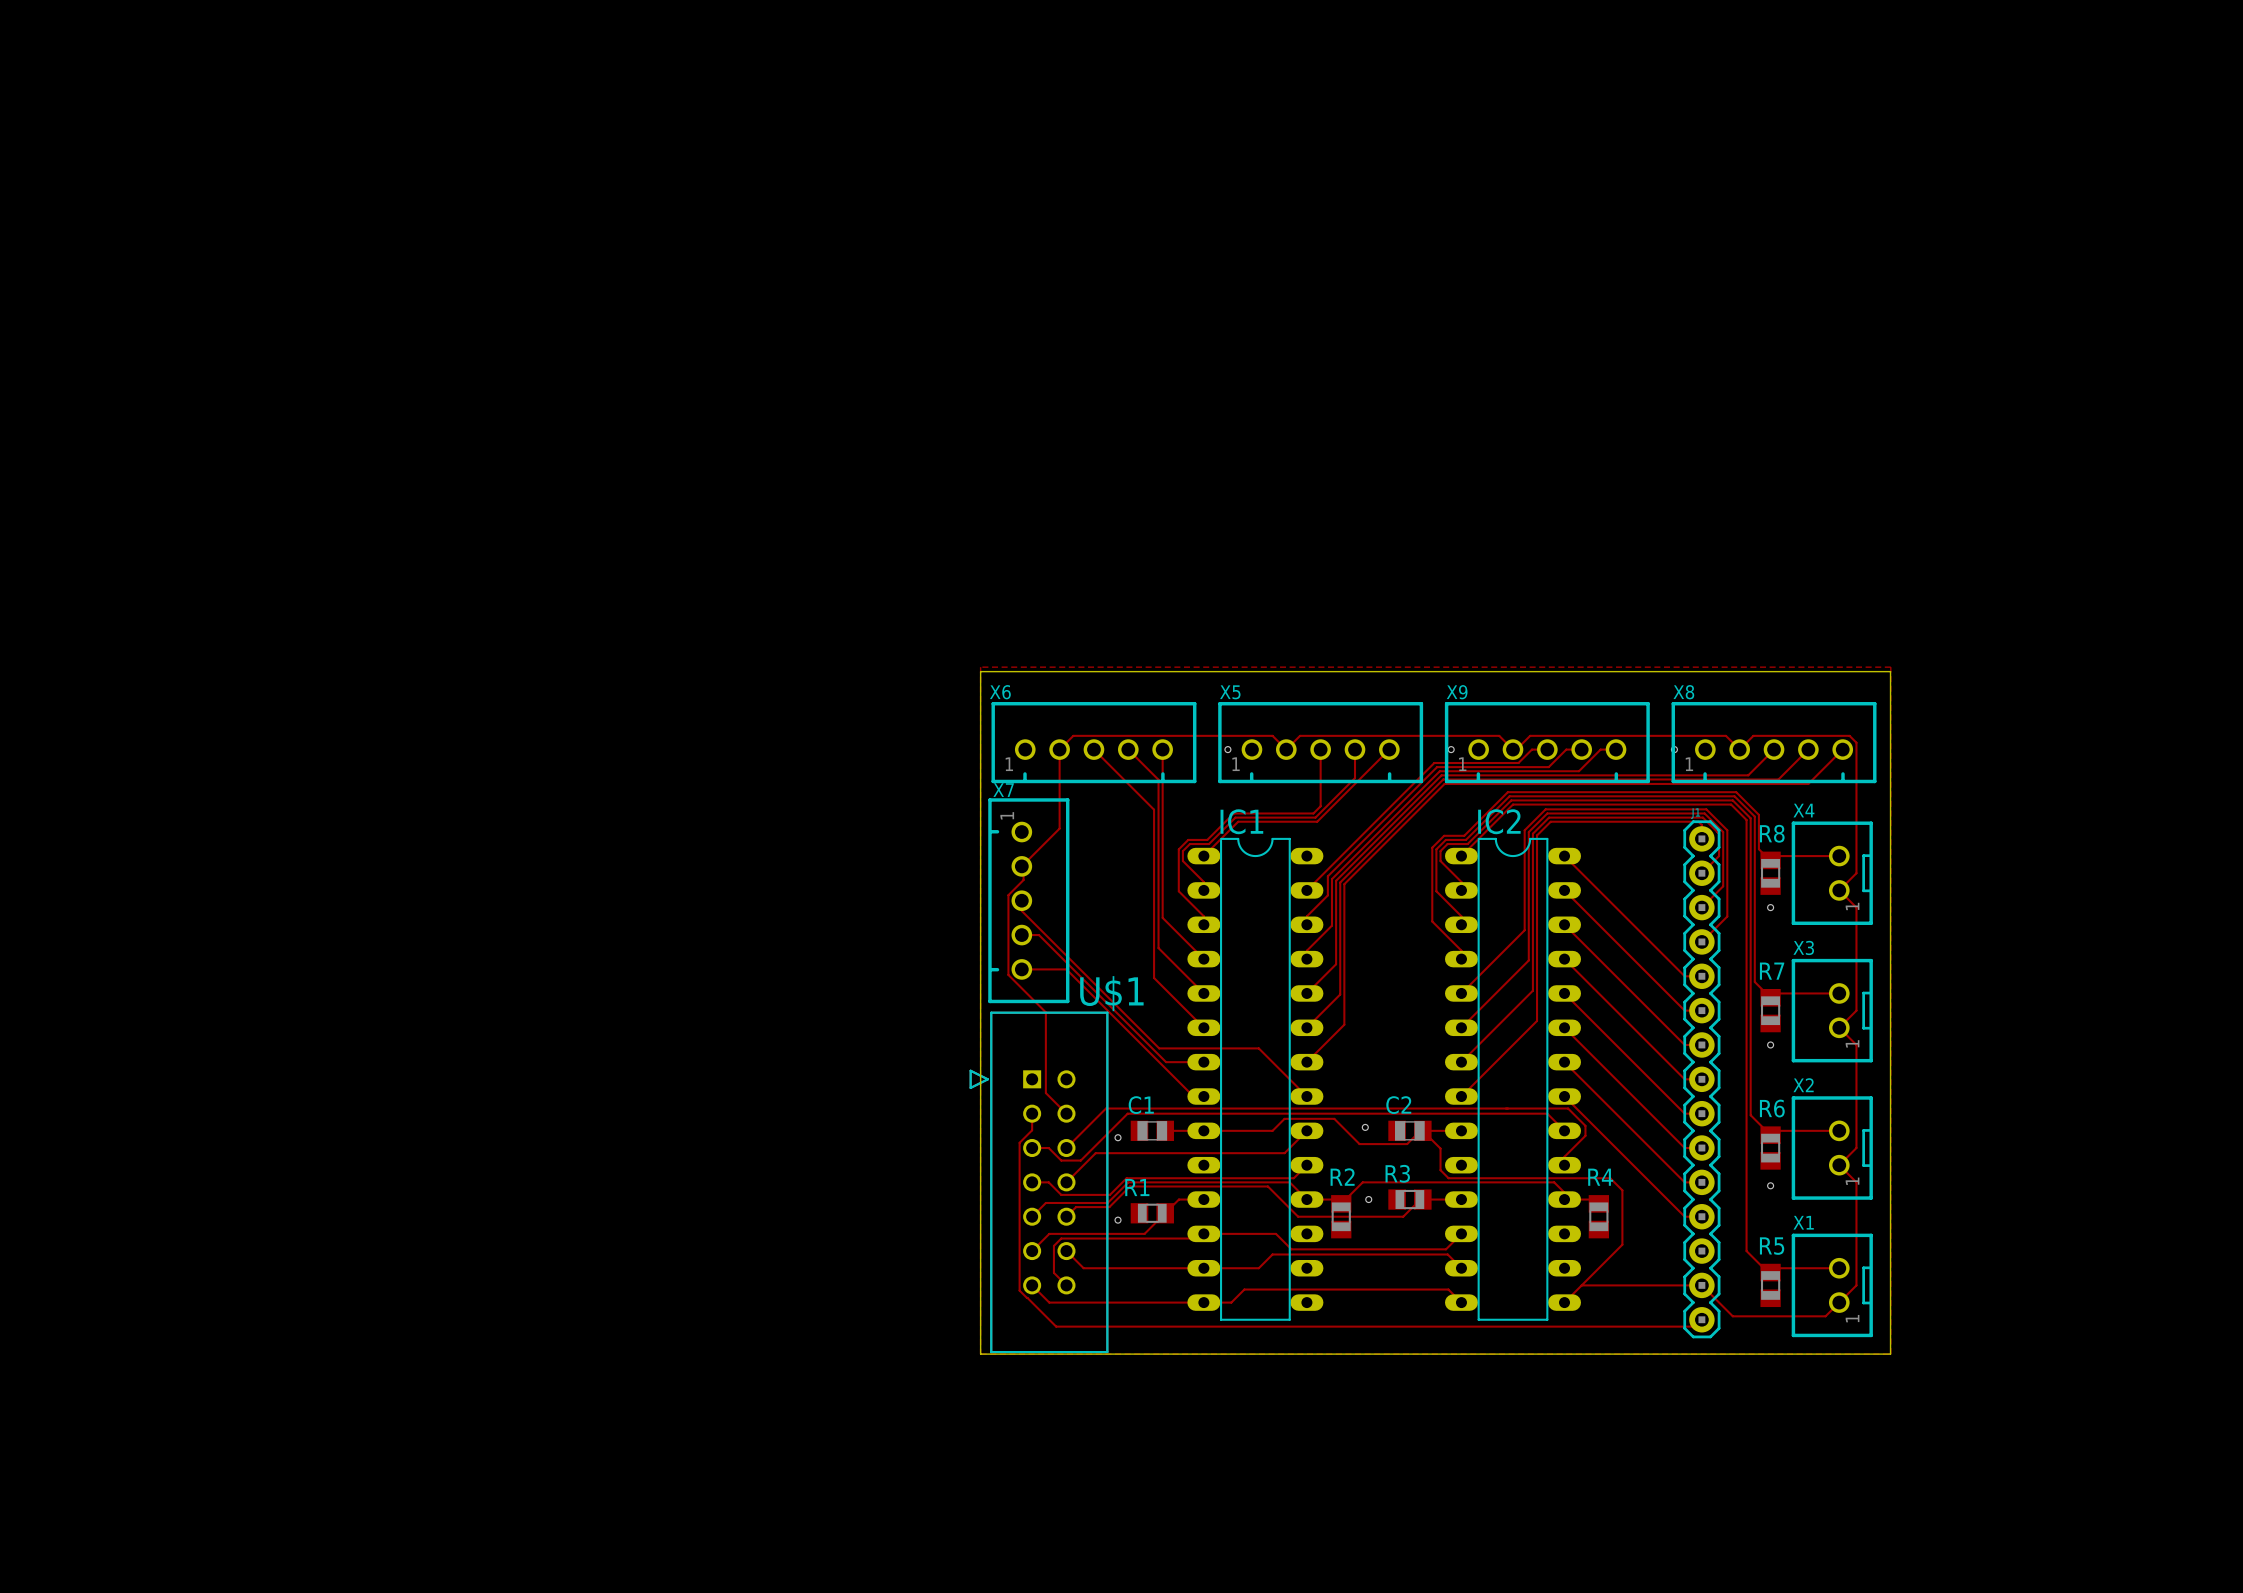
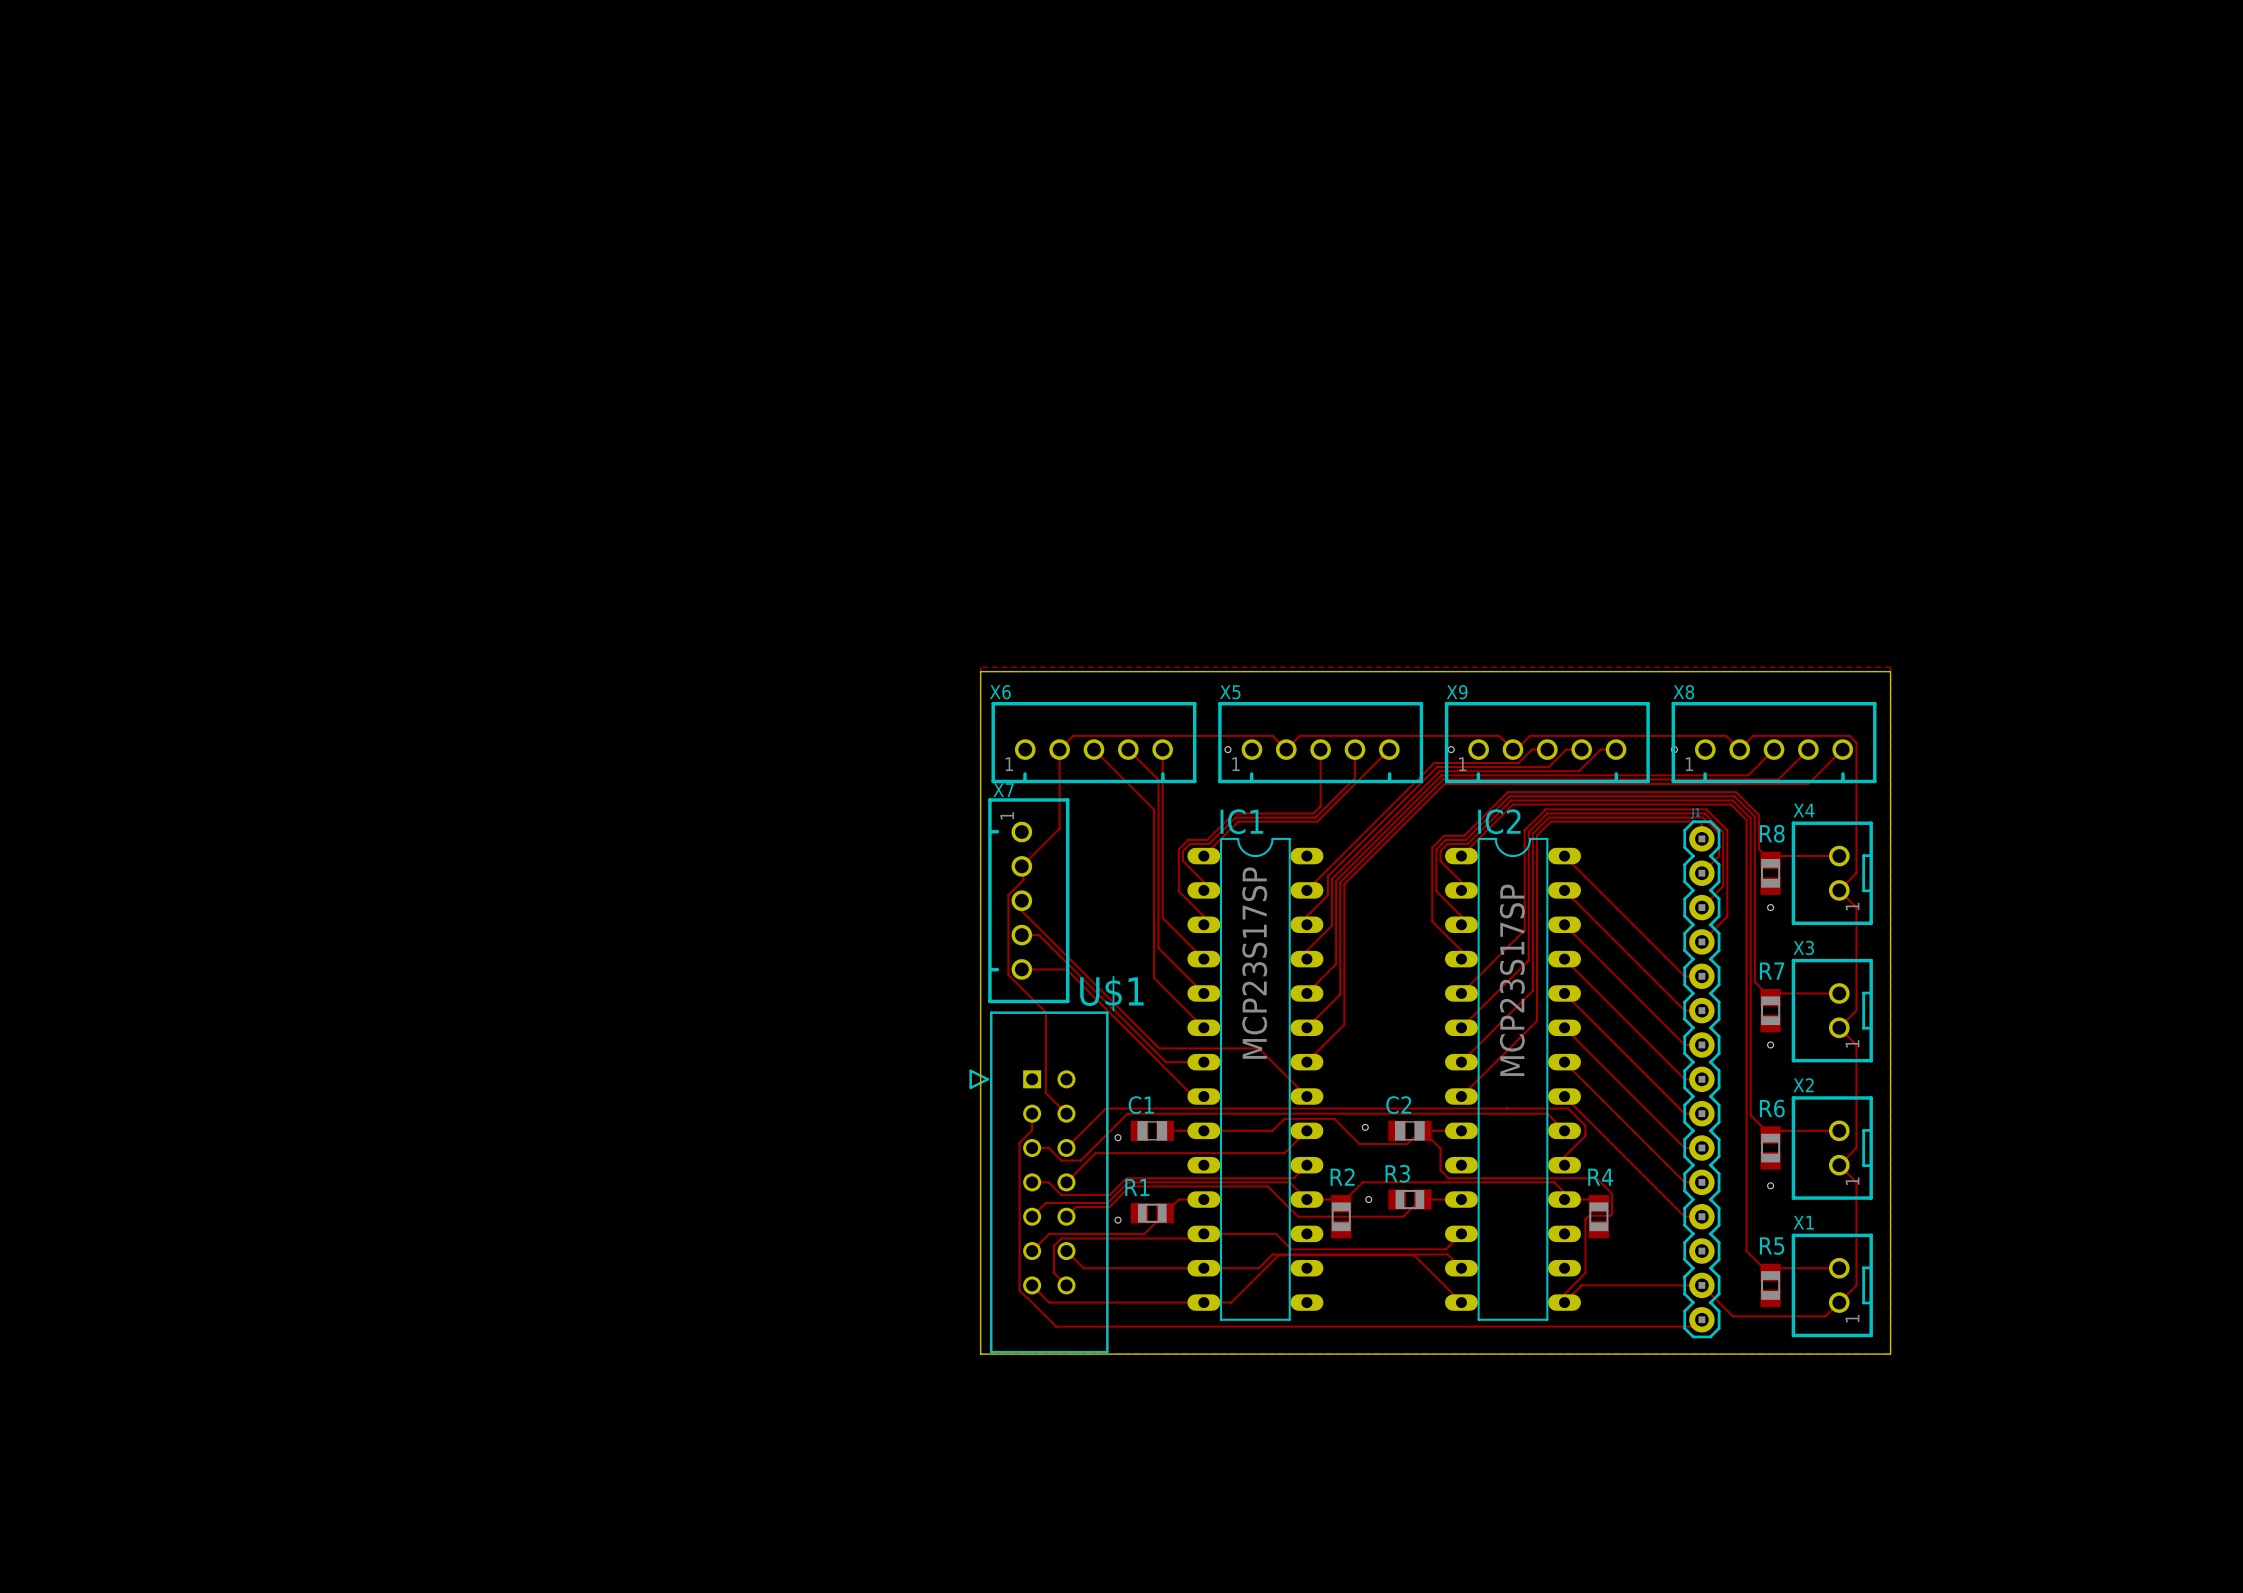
IC1 value: none -> MCP23S17SP (1254, 963)
IC2 value: none -> MCP23S17SP (1512, 980)
track: (1596, 1178) (1610, 1178) (1622, 1190) (1622, 1244) (1581, 1285) -> (1596, 1178) (1612, 1193) (1612, 1213) (1610, 1215) (1589, 1215) (1585, 1219) (1585, 1273) (1564, 1294) (1564, 1302)
track: (1244, 1289) (1448, 1289) -> (1244, 1289) (1278, 1255) (1414, 1255) (1448, 1289)

